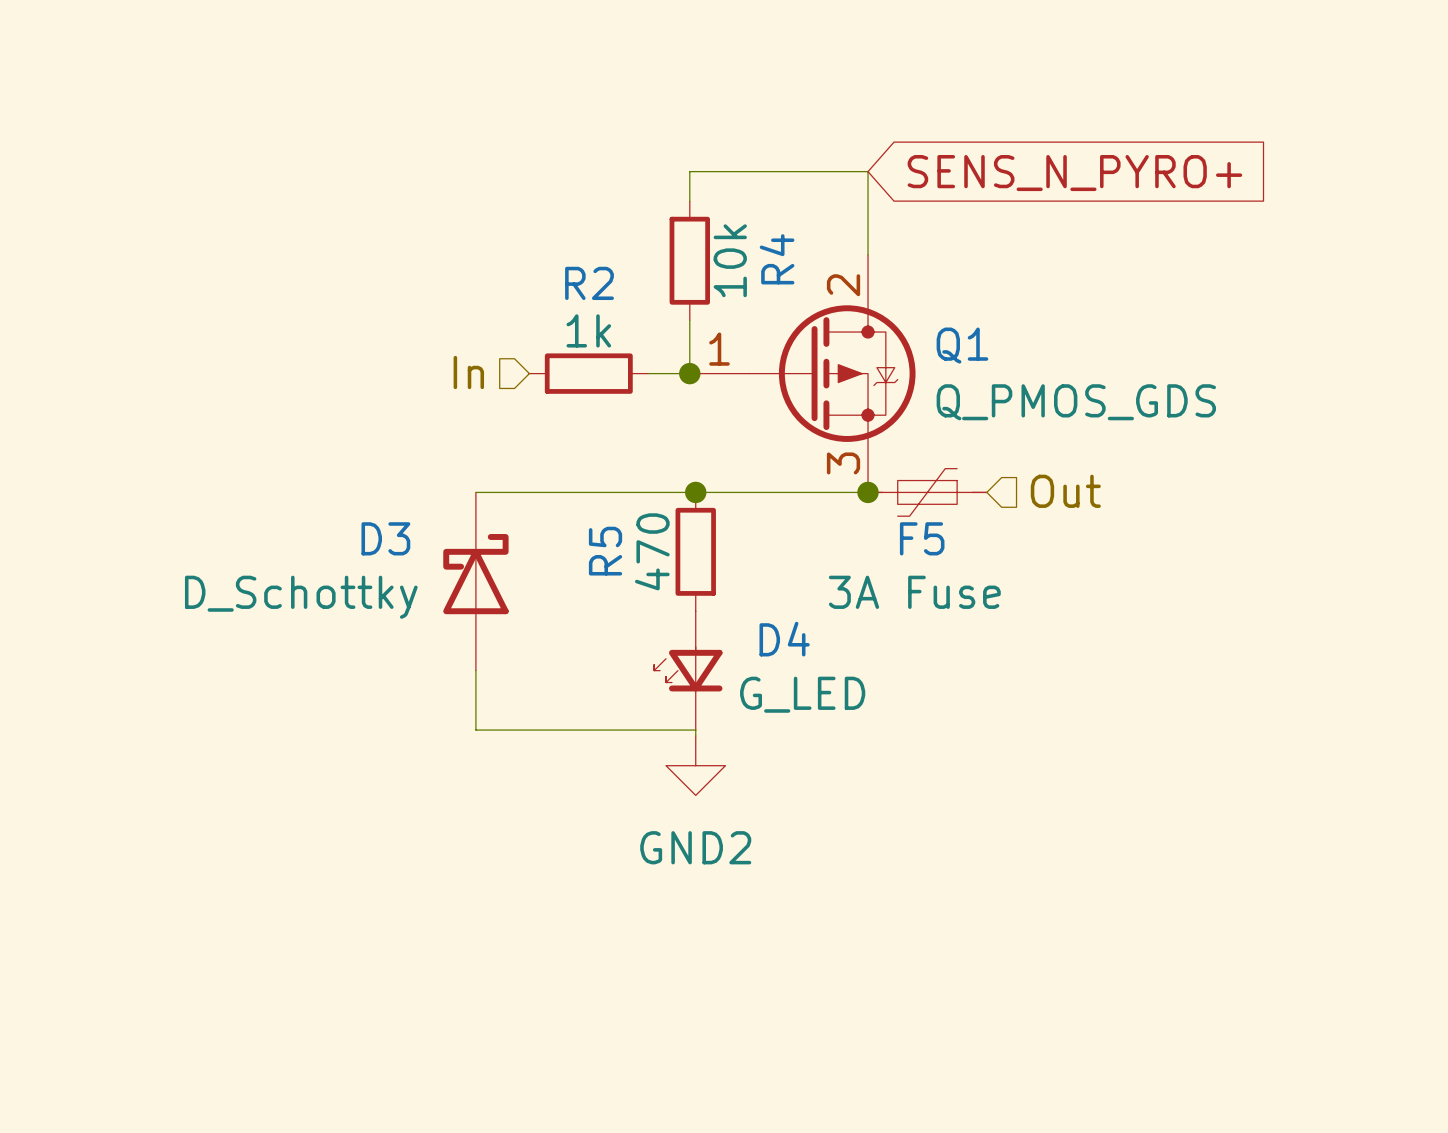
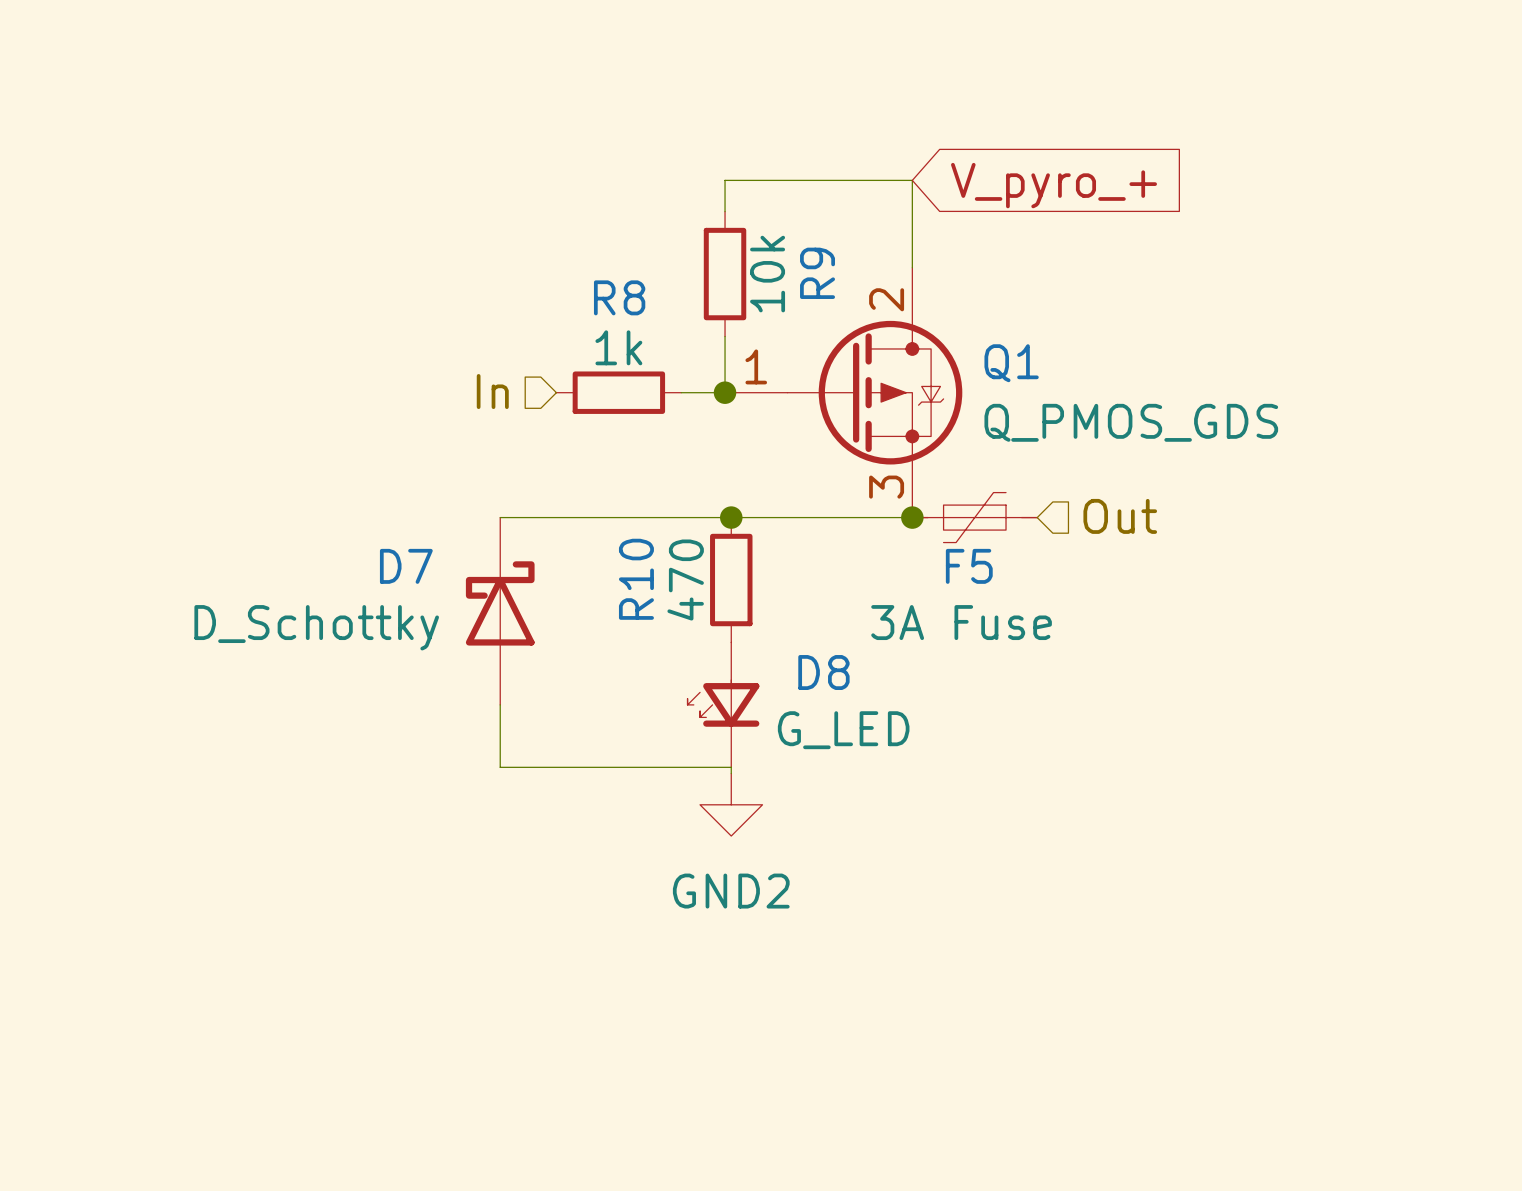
global label: SENS_N_PYRO+ (1074, 173) -> V_pyro_+ (1054, 185)
R4 name: R4 (777, 259) -> R9 (817, 273)
R2 name: R2 (589, 283) -> R8 (619, 297)
D3 name: D3 (385, 538) -> D7 (406, 566)
R5 name: R5 (605, 551) -> R10 (636, 579)
D4 name: D4 (784, 639) -> D8 (823, 672)

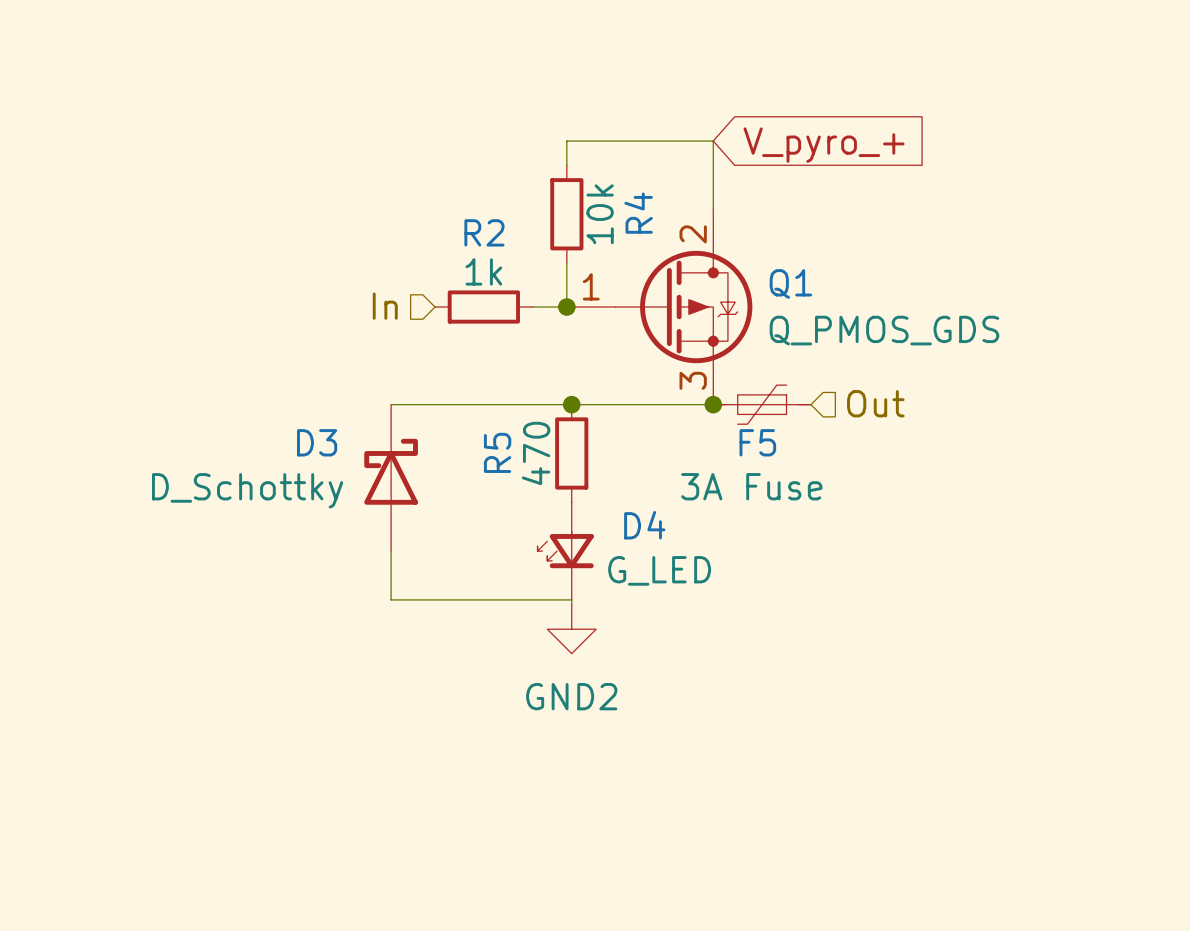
R9 name: R9 (817, 273) -> R4 (638, 213)
R8 name: R8 (619, 297) -> R2 (484, 232)
D7 name: D7 (406, 566) -> D3 (317, 442)
R10 name: R10 (636, 579) -> R5 (497, 452)
D8 name: D8 (823, 672) -> D4 (644, 525)

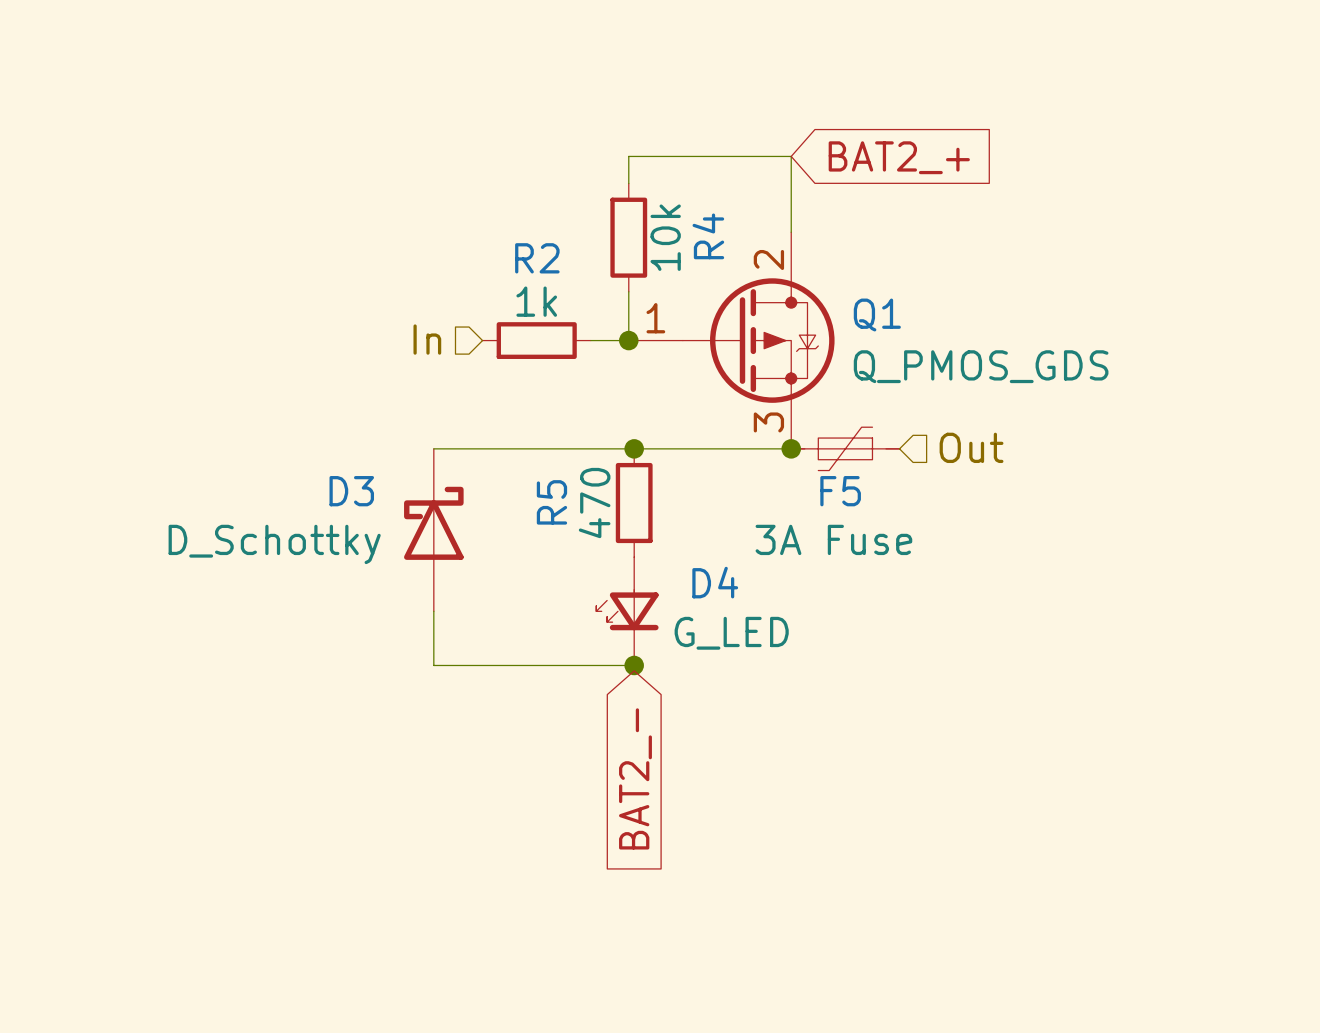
global label: V_pyro_+ (824, 145) -> BAT2_+ (899, 157)
junction: none -> (634, 665)
power symbol: GND2 (571, 629) -> none
global label: none -> BAT2_- (635, 778)

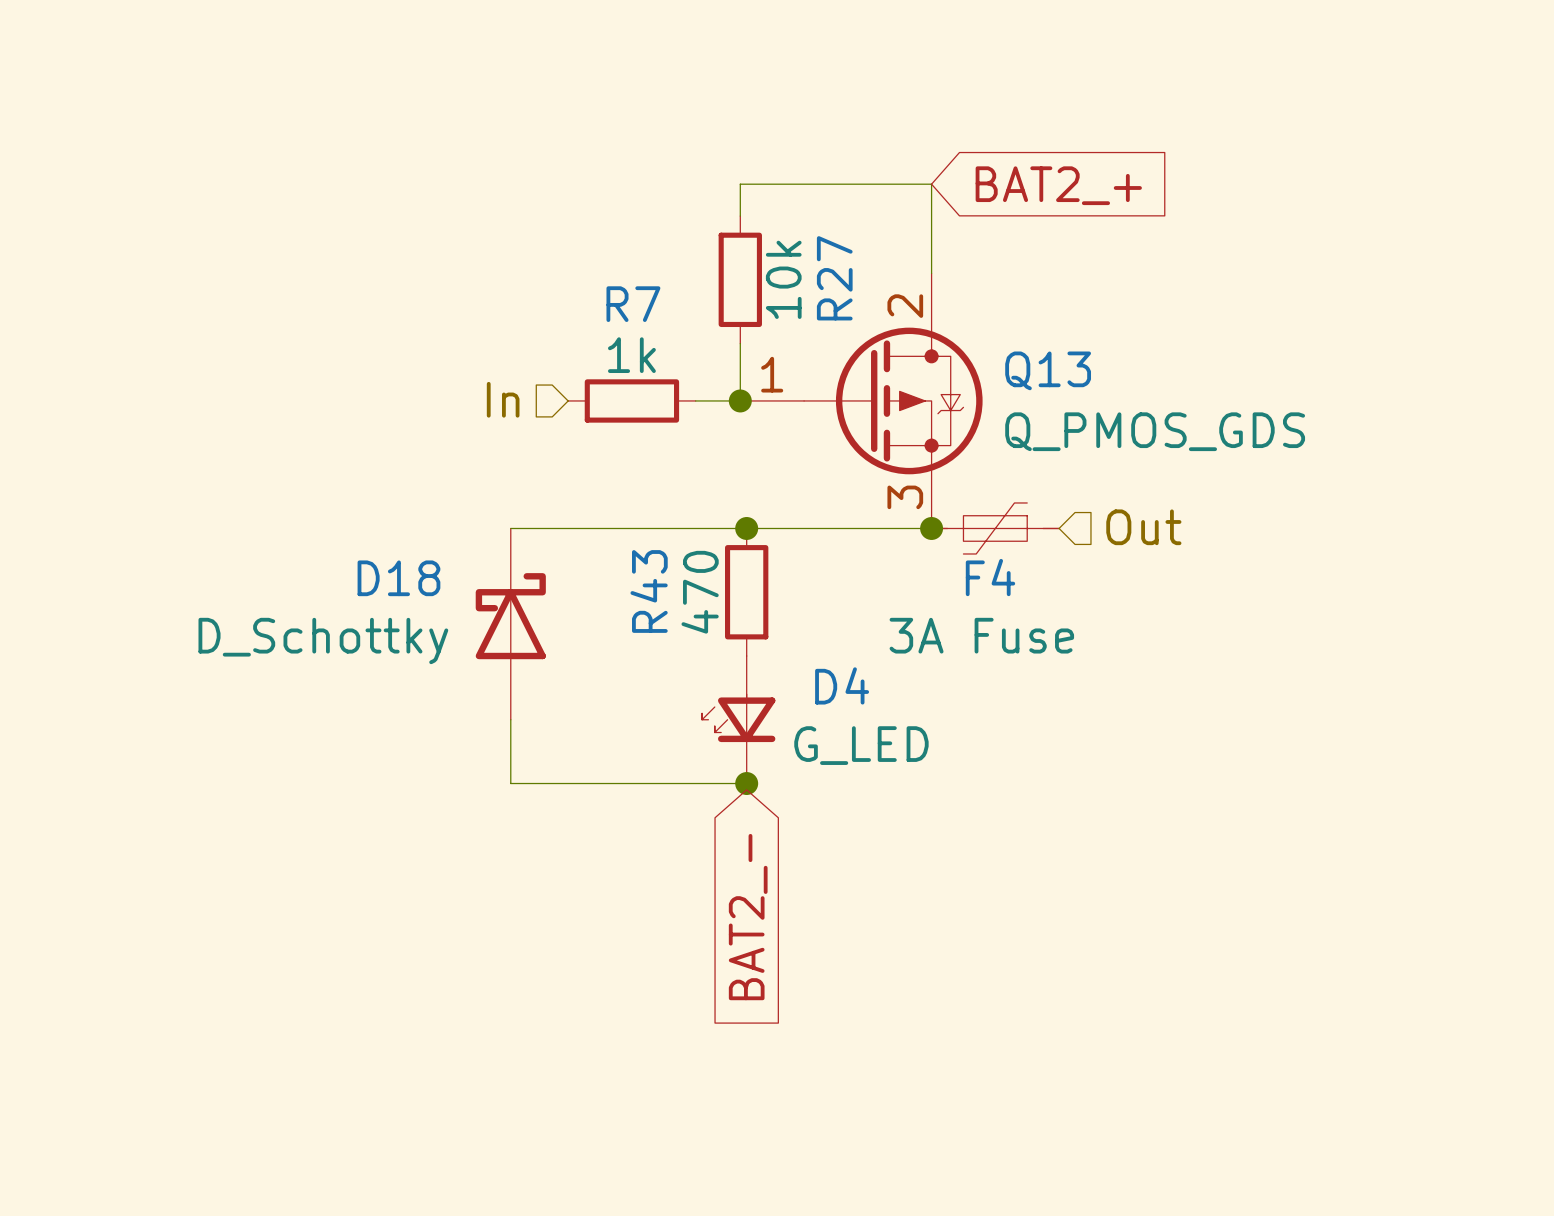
R4 name: R4 (708, 236) -> R27 (834, 278)
R2 name: R2 (537, 258) -> R7 (633, 304)
Q1 name: Q1 (877, 315) -> Q13 (1048, 370)
D3 name: D3 (351, 491) -> D18 (398, 578)
F5 name: F5 (840, 491) -> F4 (990, 577)
R5 name: R5 (551, 502) -> R43 (649, 591)

